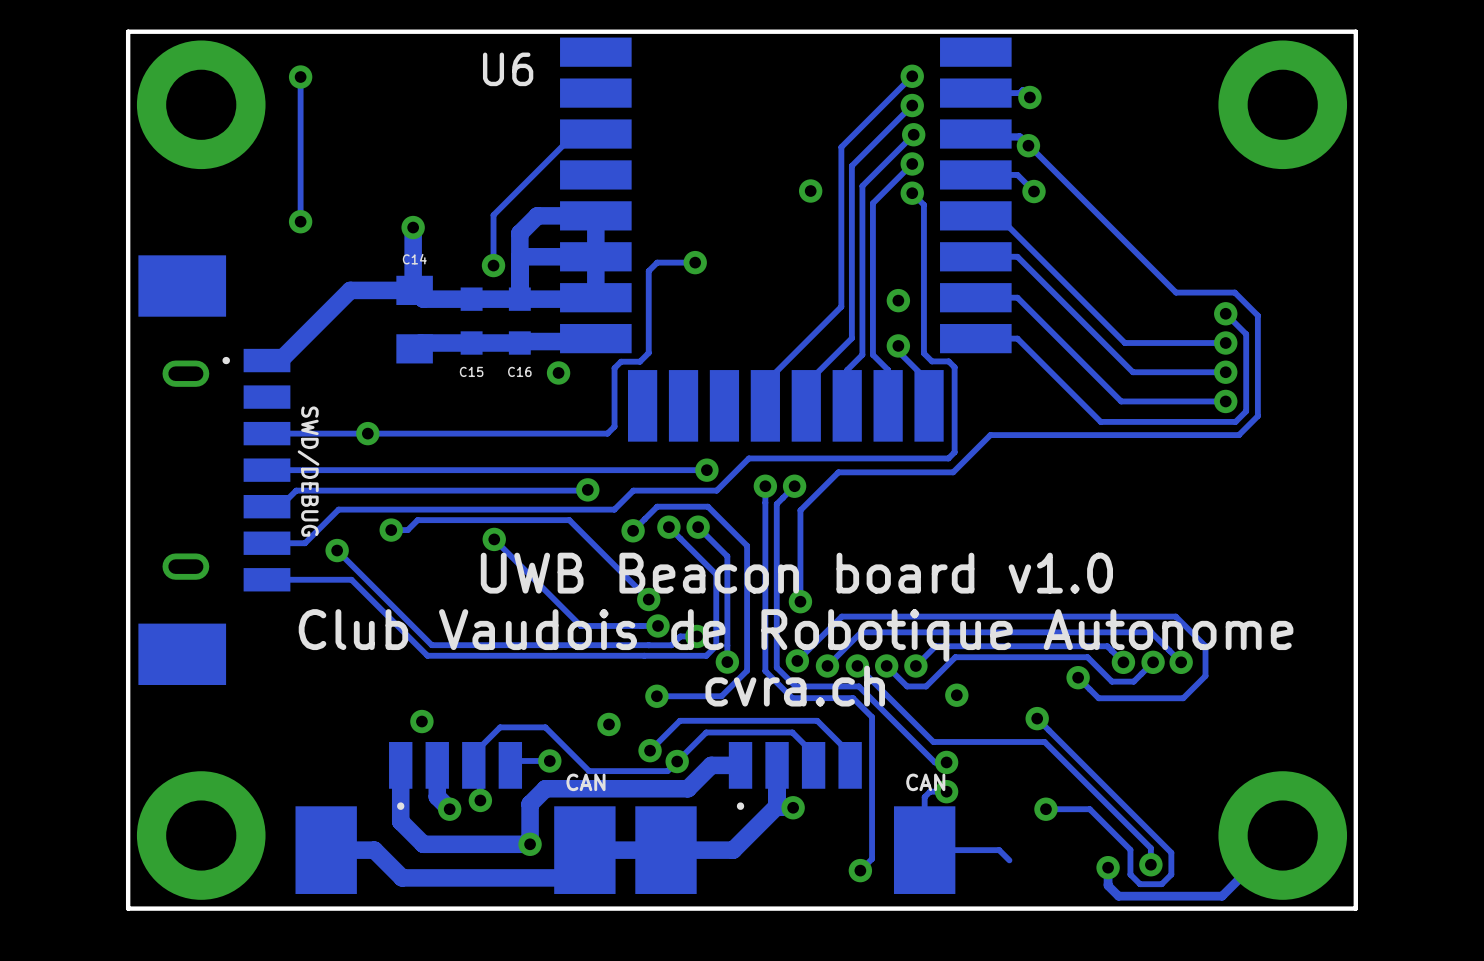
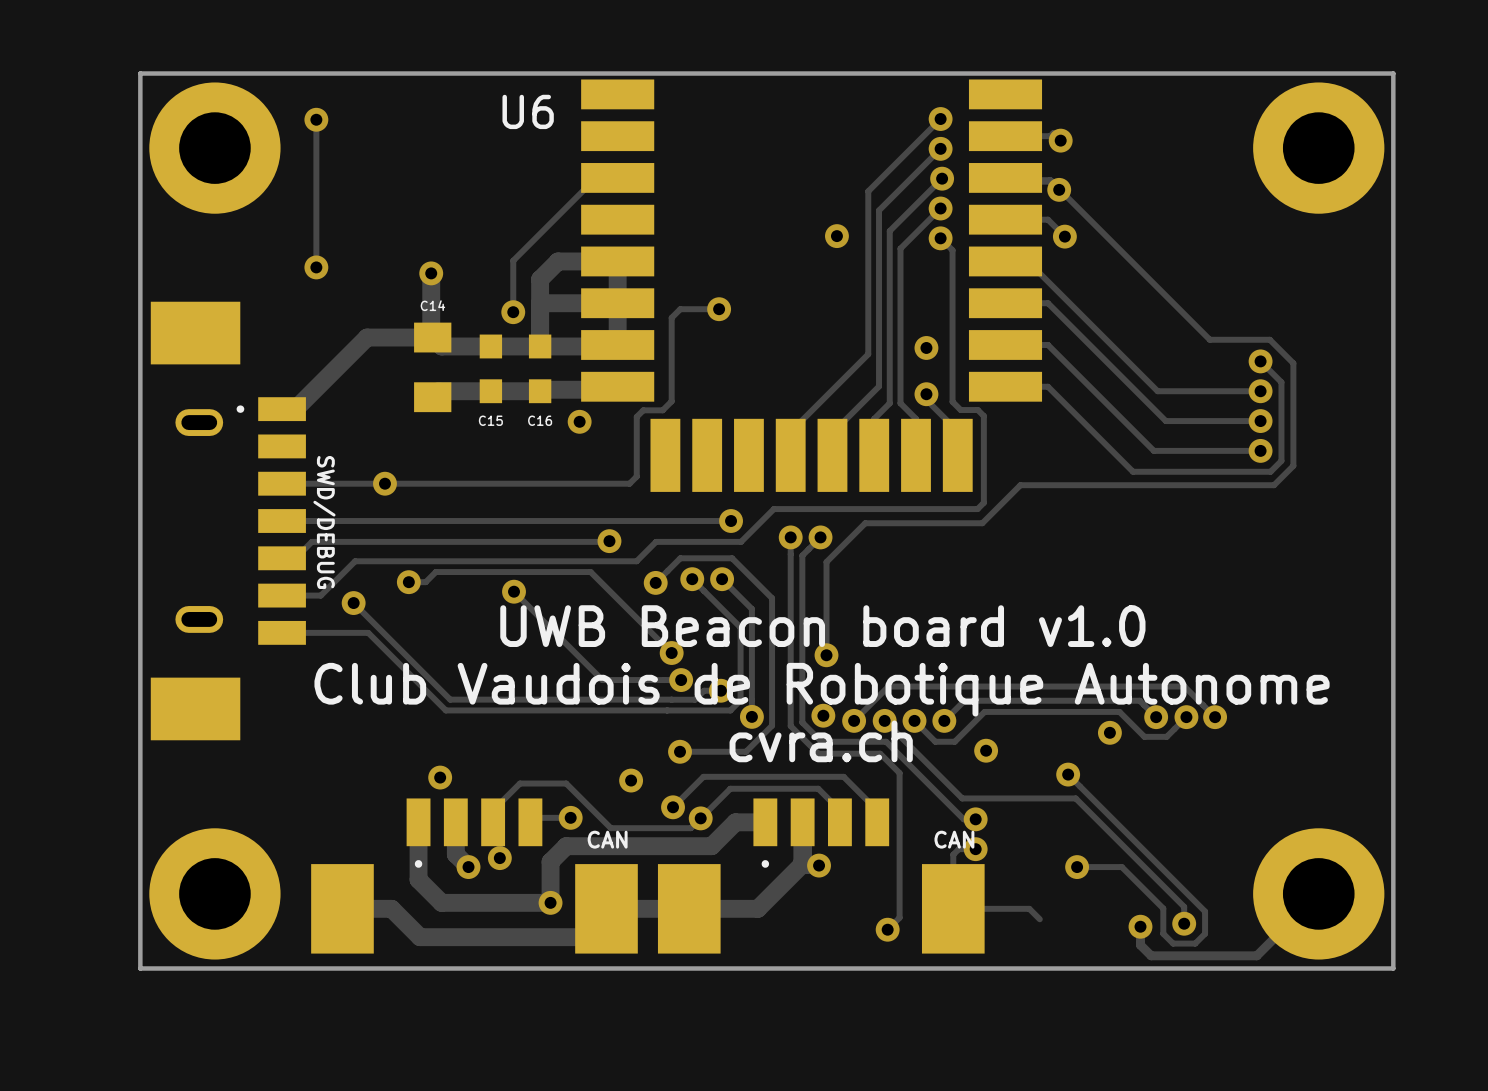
track: (797, 660) (841, 616) (1175, 616) (1205, 646) (1205, 675) (1183, 698) (1098, 698) (1078, 677) -> none

